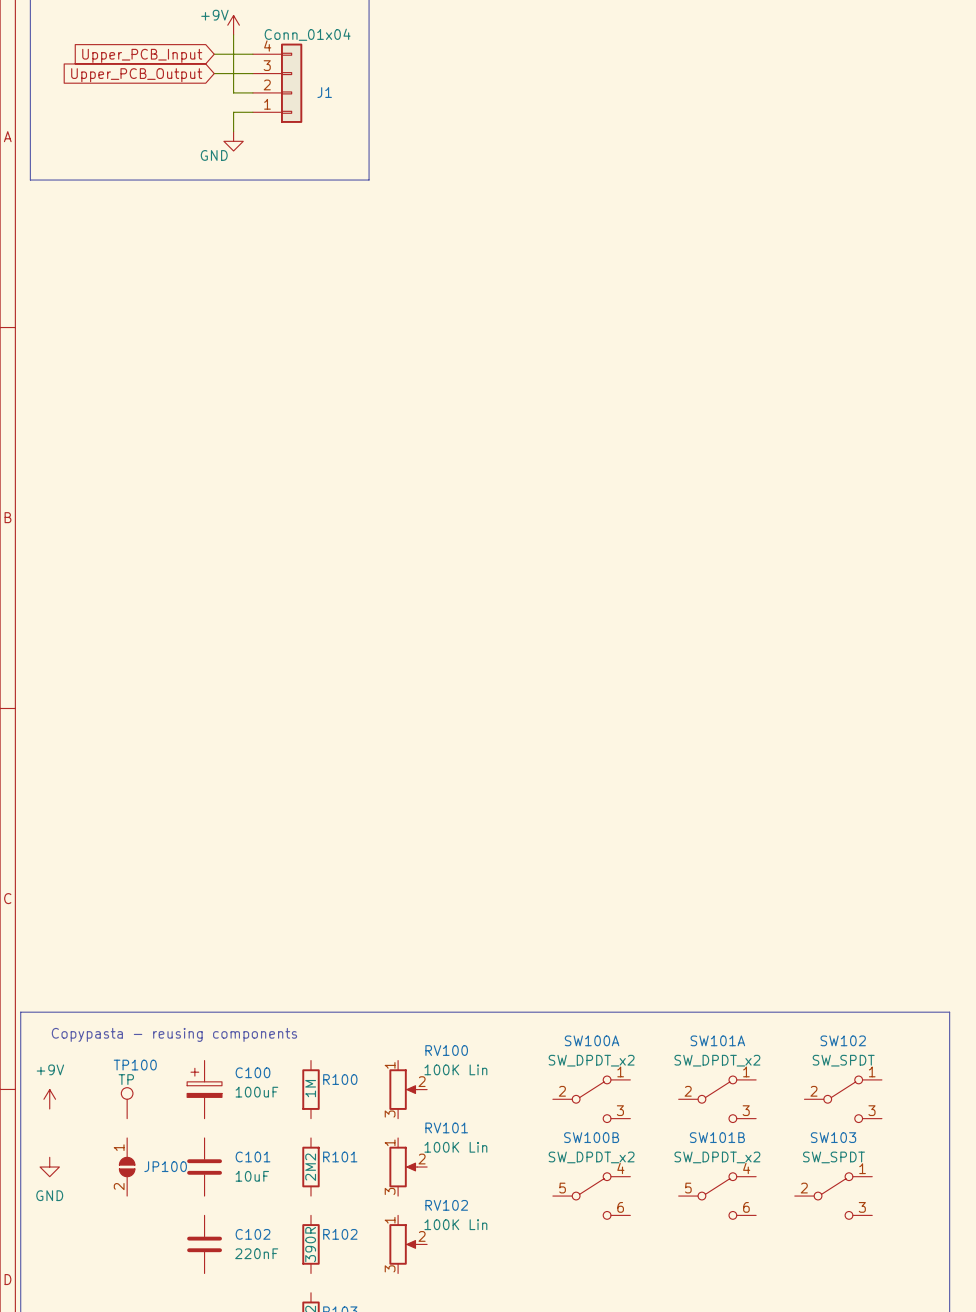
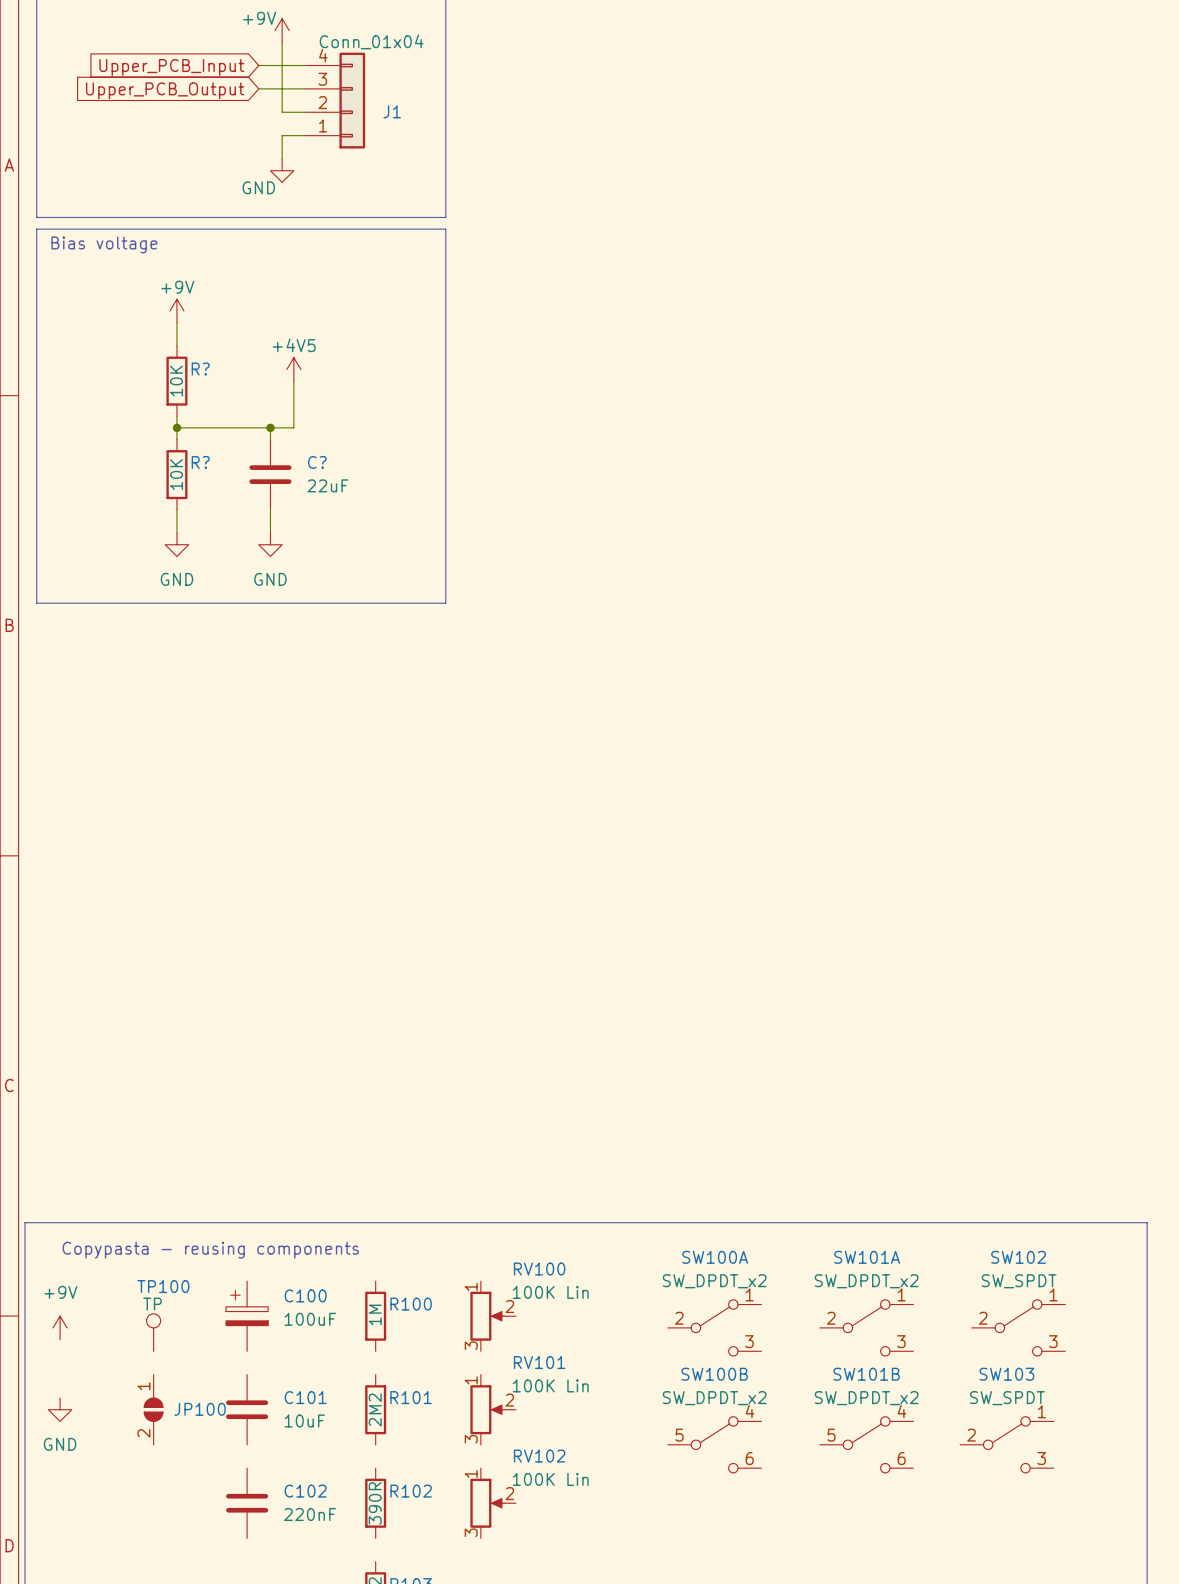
line: none -> (36, 229) (36, 603) (445, 603) (445, 229) (36, 229)
text: none -> Bias voltage (104, 244)
power symbol: none -> +9V (176, 310)
wire: none -> (176, 322) (176, 346)
power symbol: none -> +4V5 (293, 369)
R?: none -> 10K (176, 381)
wire: none -> (293, 381) (293, 427) (176, 427)
wire: none -> (176, 416) (176, 439)
junction: none -> (176, 427)
wire: none -> (270, 427) (270, 439)
junction: none -> (270, 427)
R?: none -> 10K (176, 474)
C?: none -> 22uF (270, 474)
wire: none -> (176, 509) (176, 533)
wire: none -> (270, 509) (270, 533)
power symbol: none -> GND (176, 544)
power symbol: none -> GND (270, 544)

